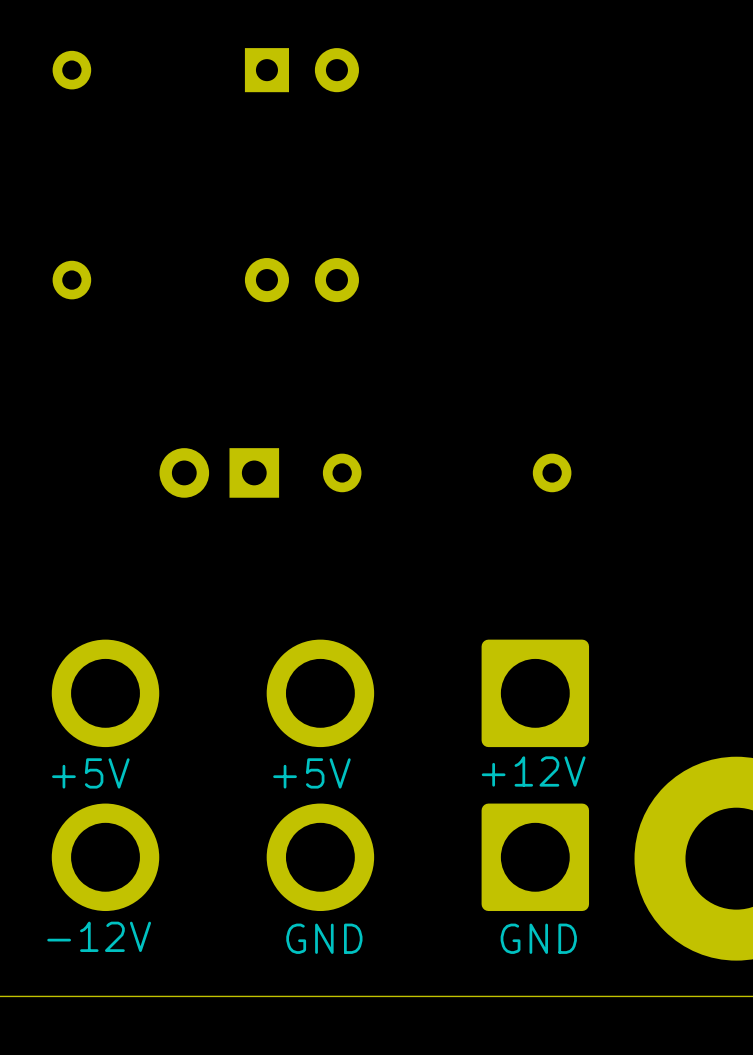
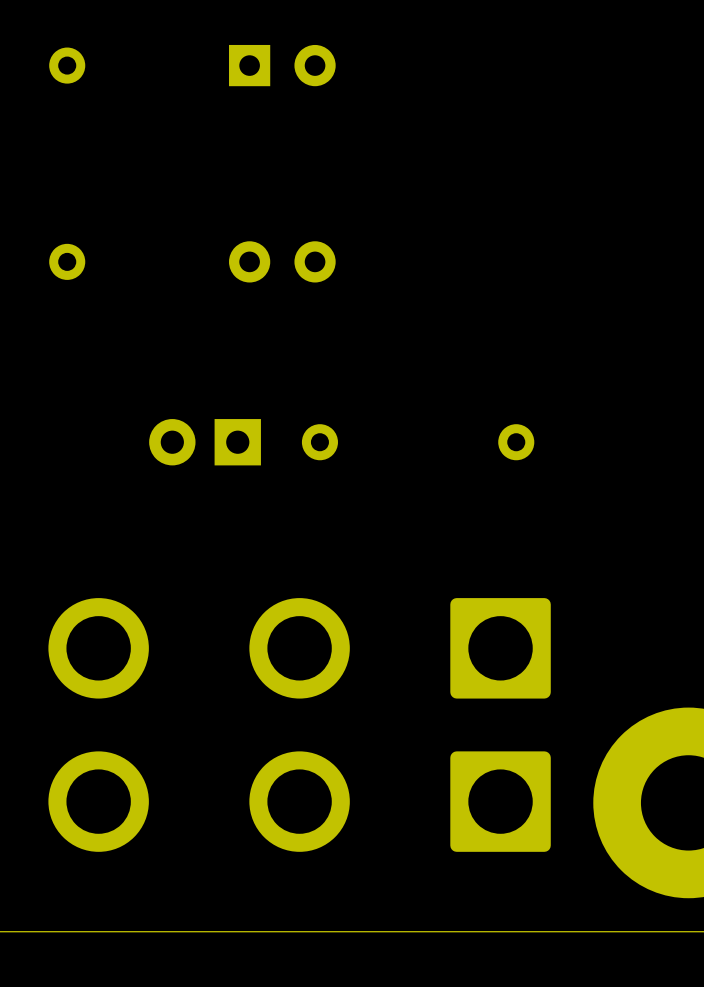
text: +12V (533, 771) -> none
text: +5V (90, 773) -> none
text: +5V (311, 773) -> none
text: -12V (99, 936) -> none
text: GND (324, 938) -> none
text: GND (538, 938) -> none

